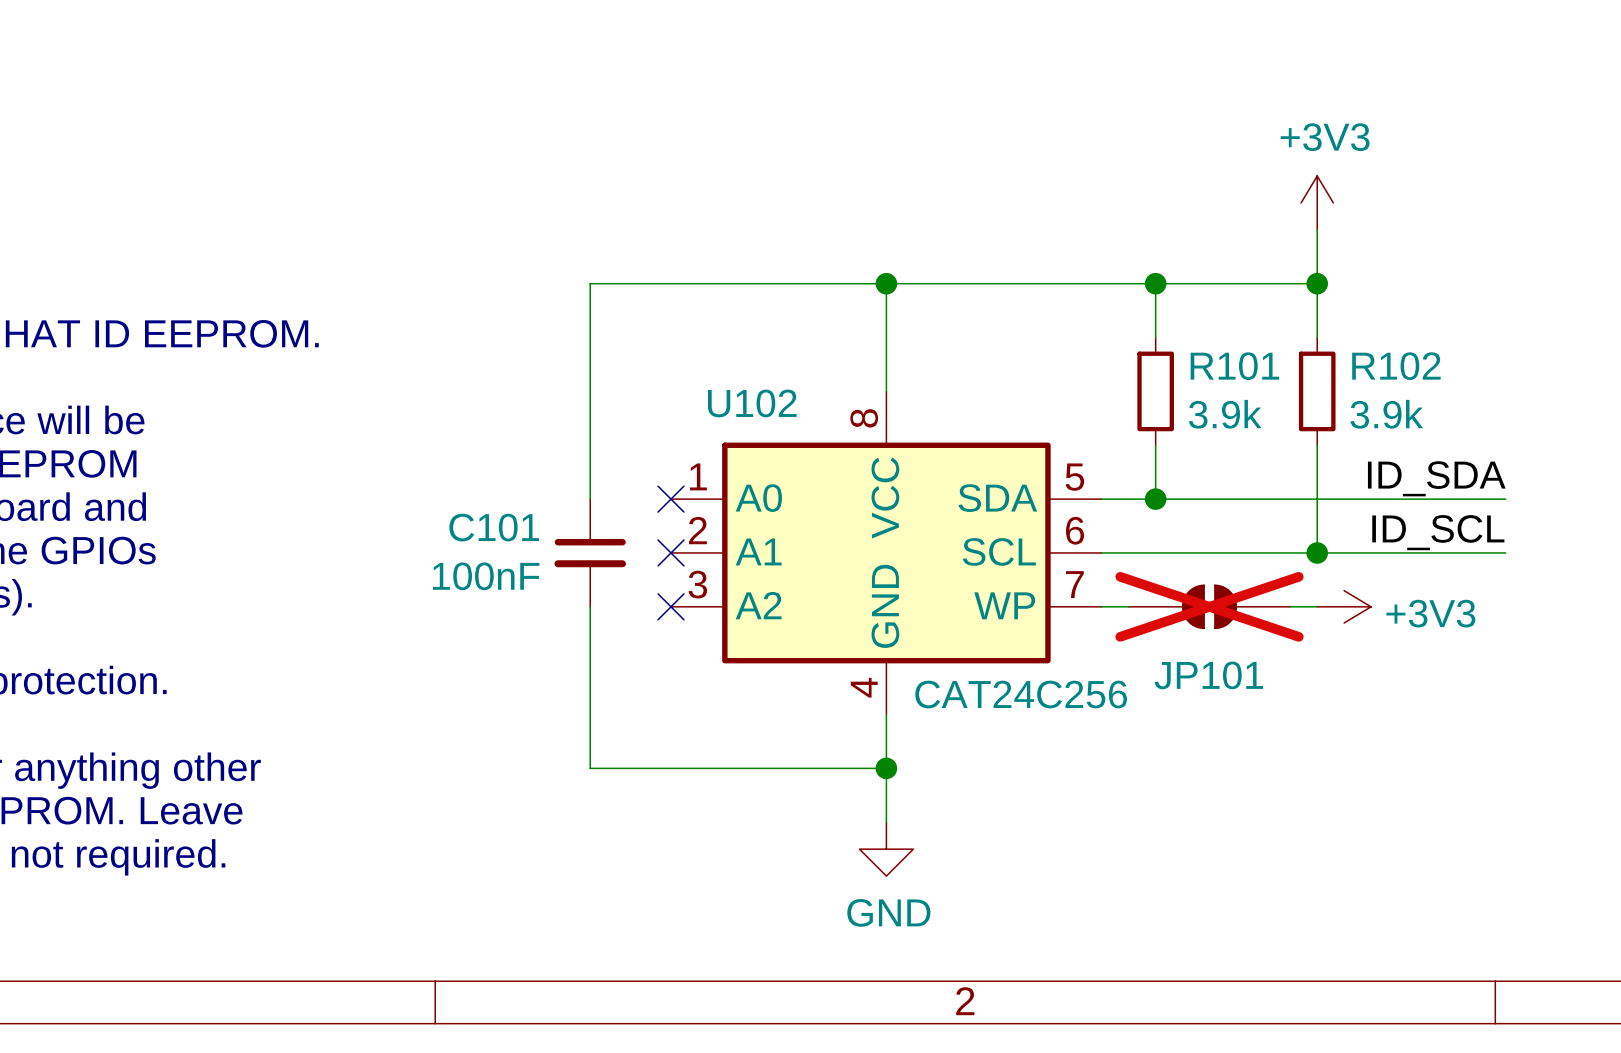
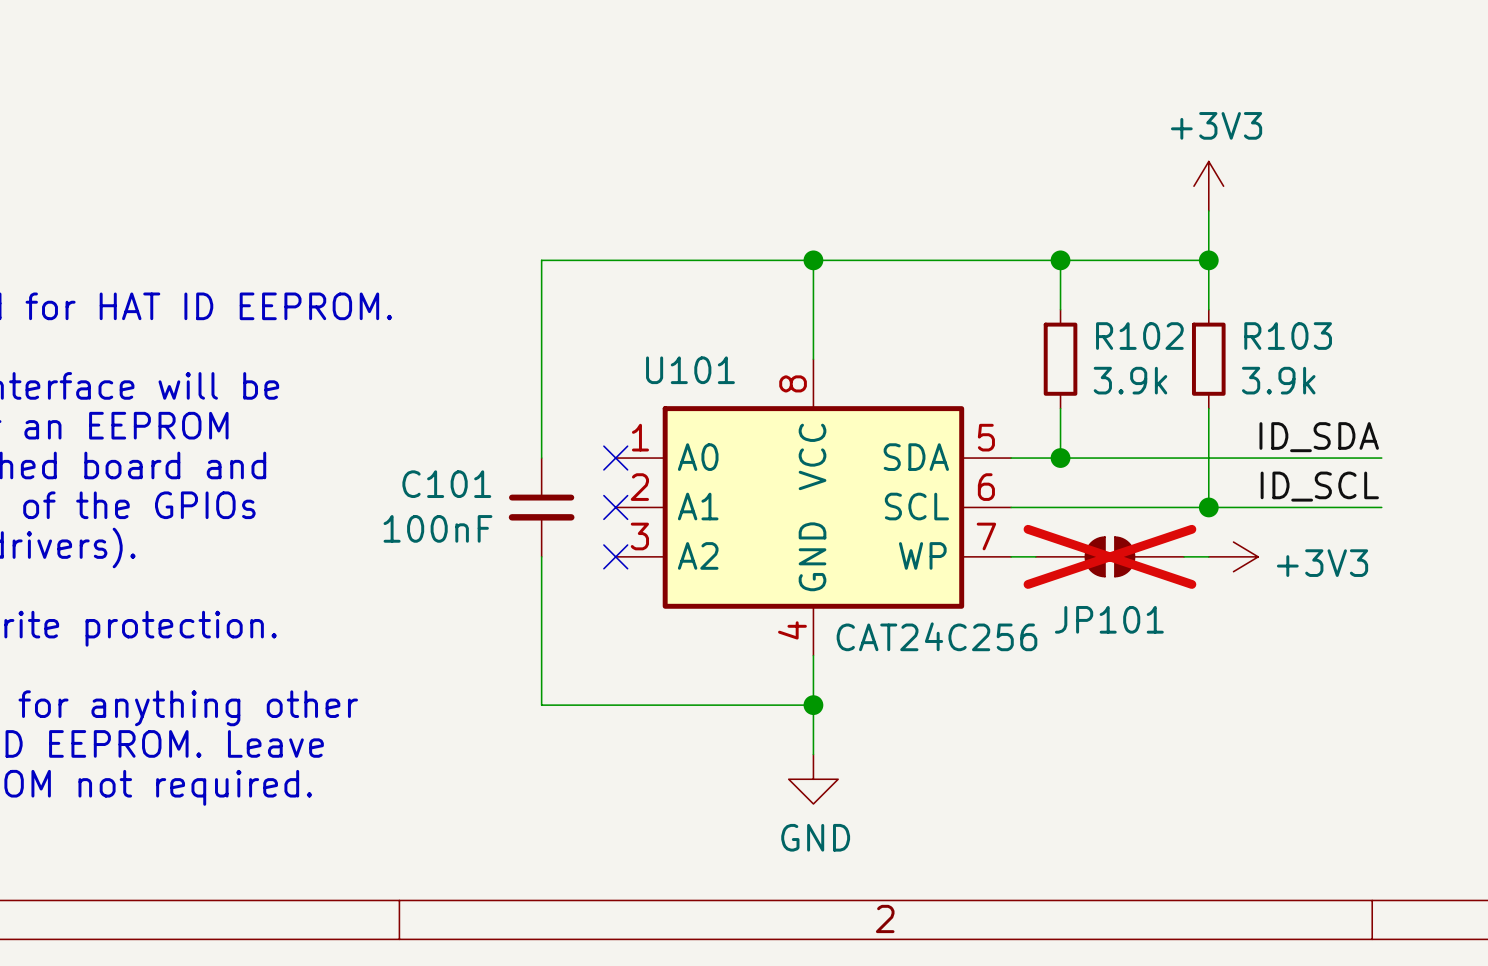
R101 name: R101 (1234, 366) -> R102 (1139, 336)
R102 name: R102 (1396, 366) -> R103 (1288, 336)
U102 name: U102 (752, 403) -> U101 (690, 370)

